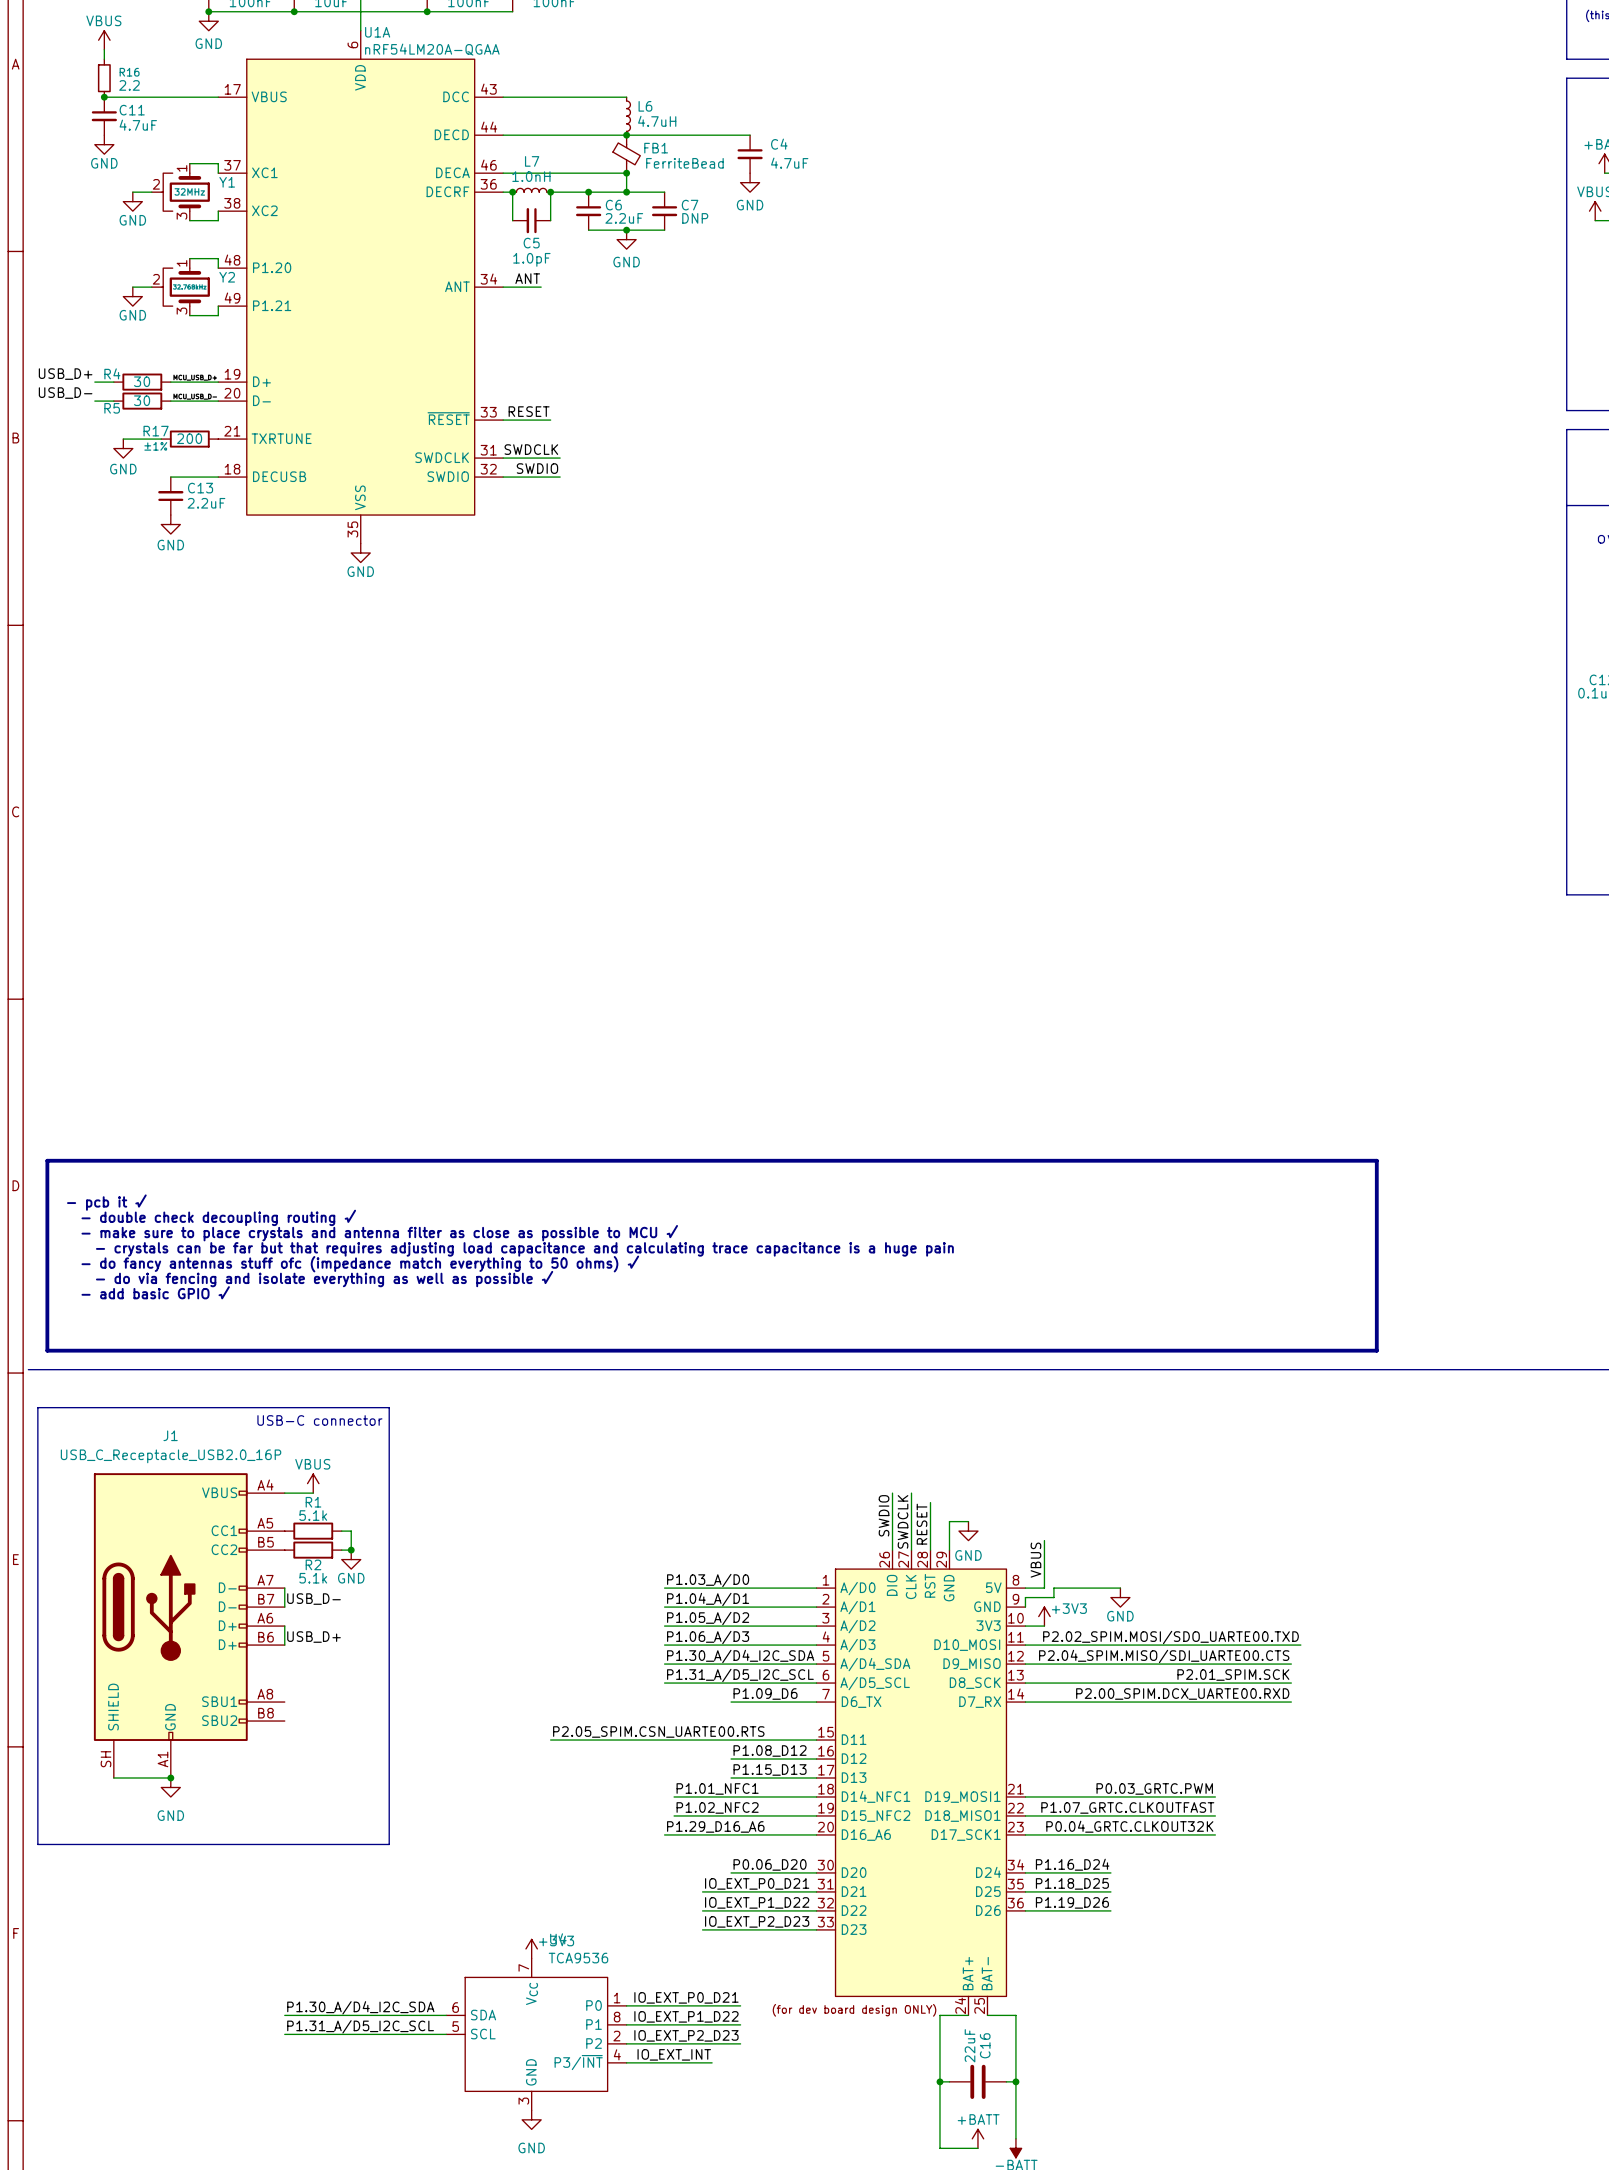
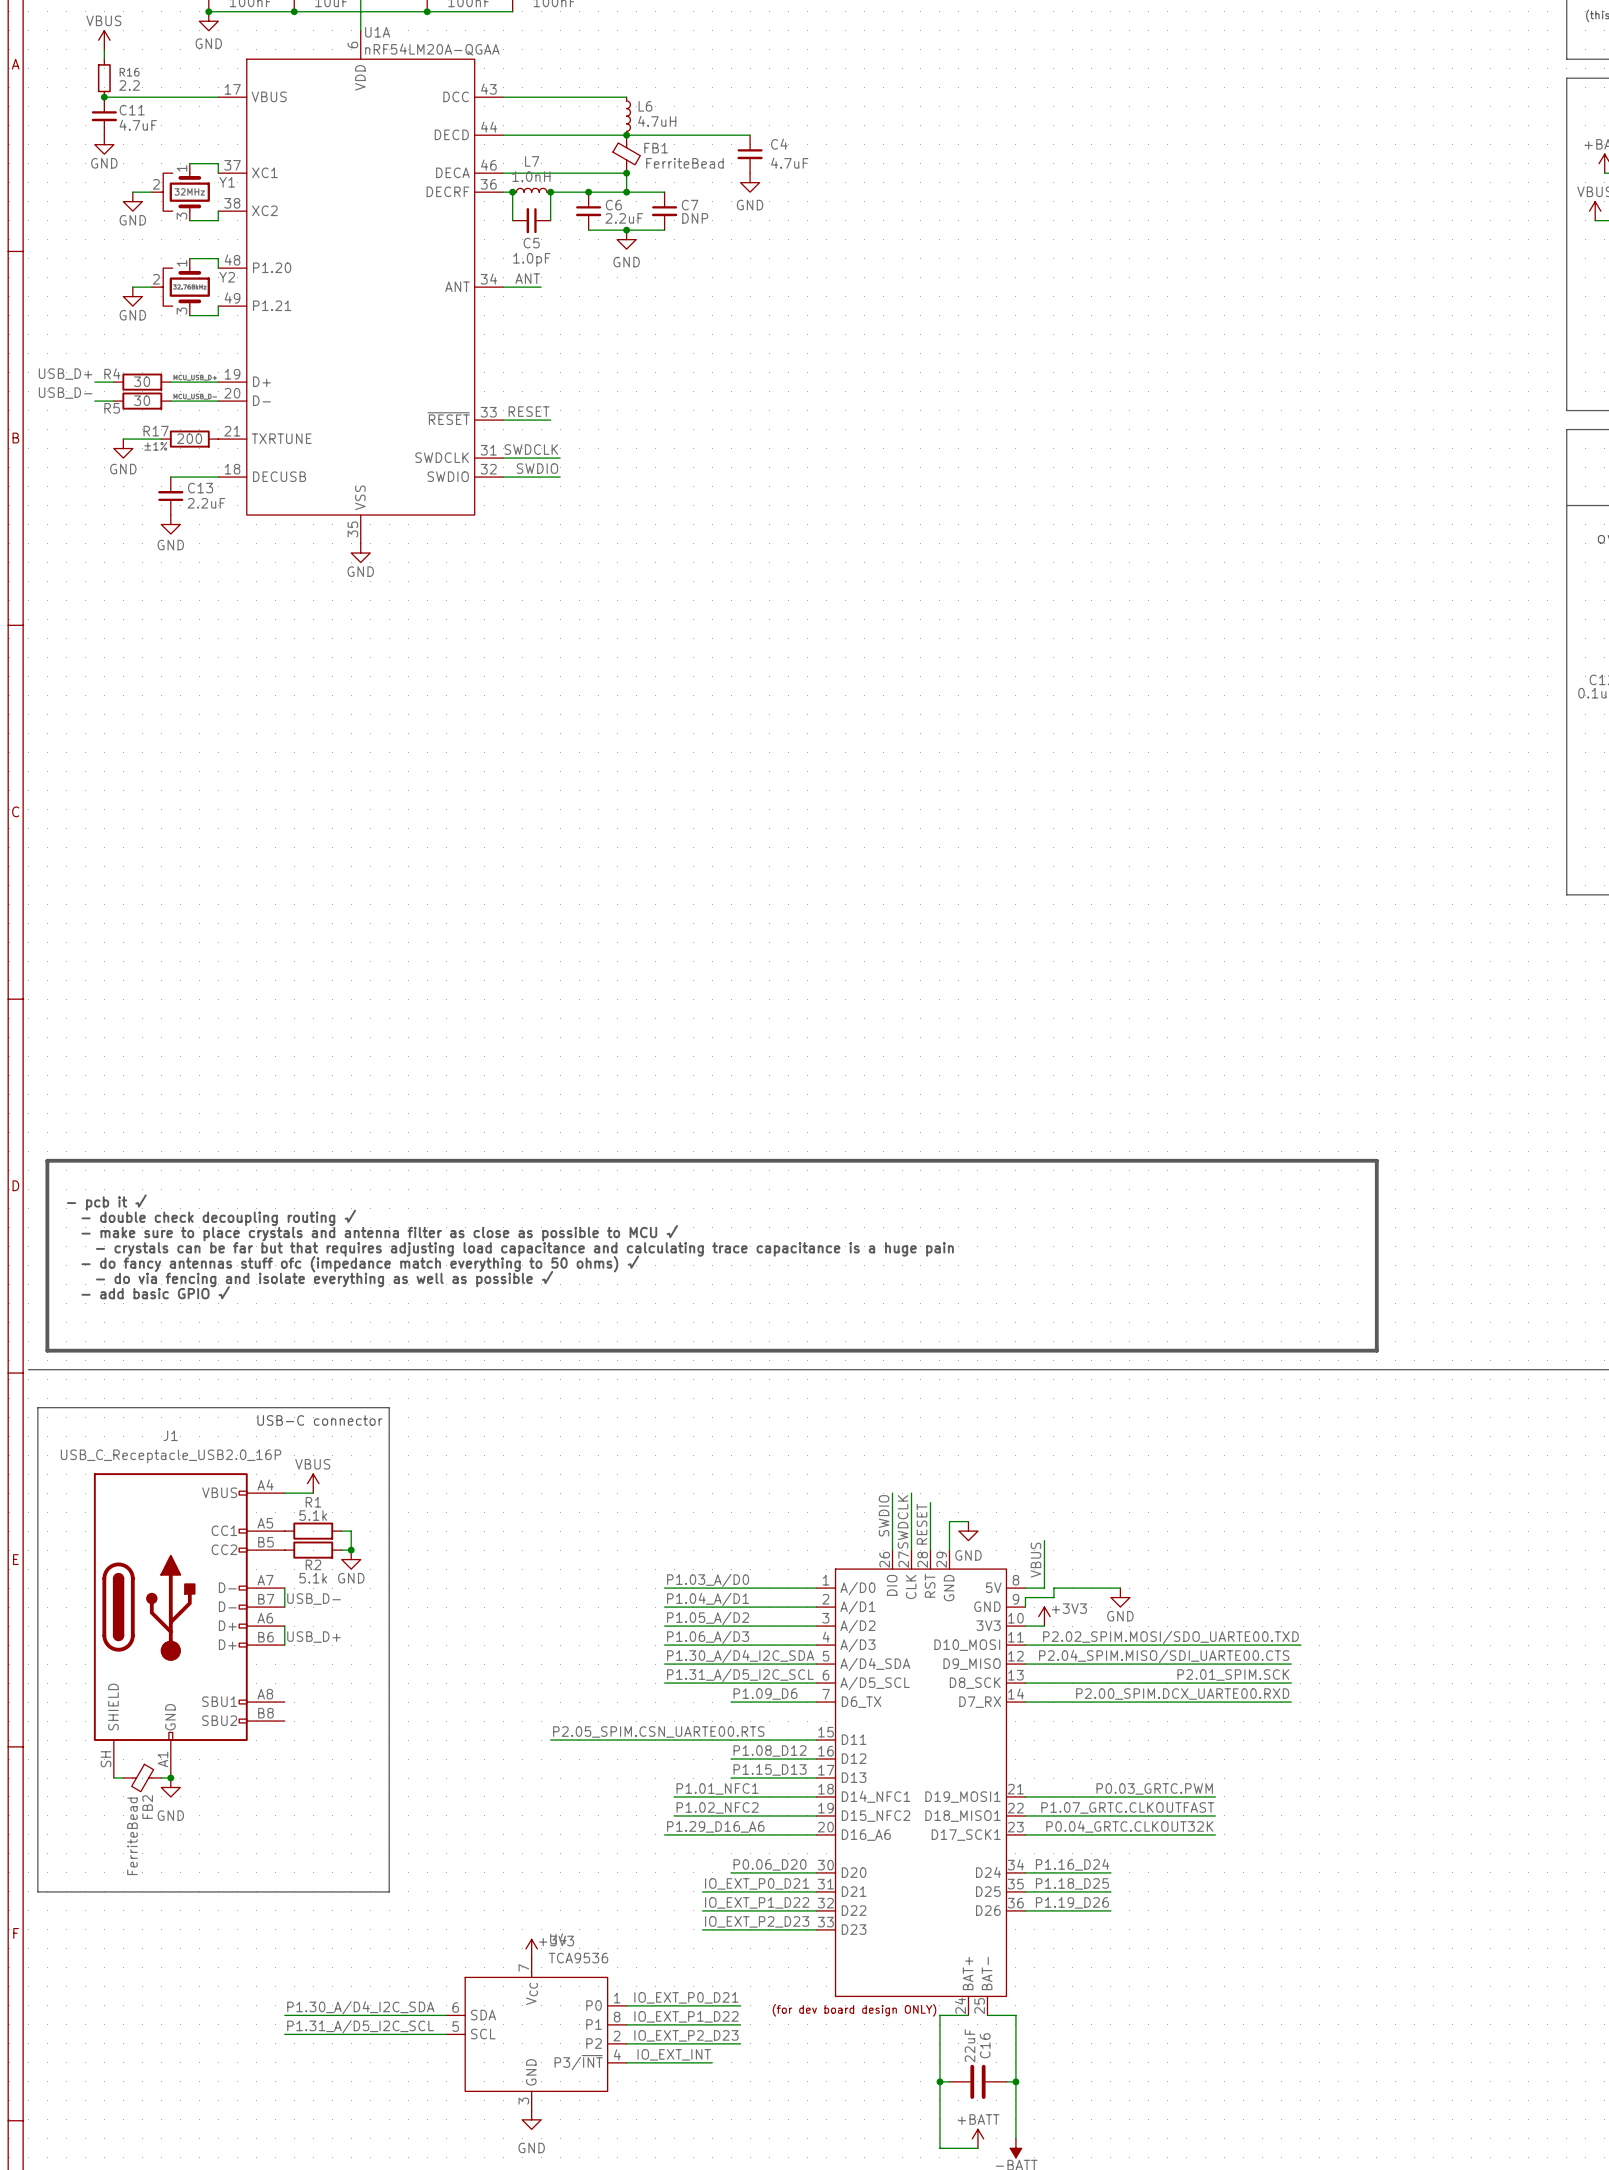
FB2: none -> FerriteBead (142, 1778)
line: (37, 1844) (389, 1844) -> (37, 1844) (37, 1891) (389, 1891) (389, 1844)

